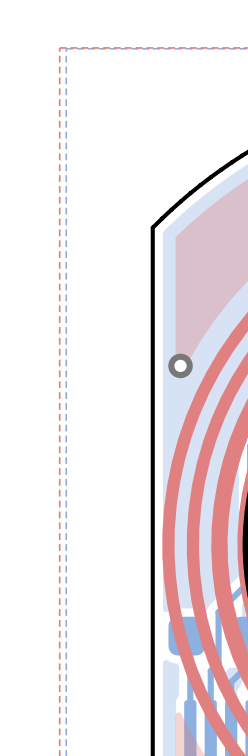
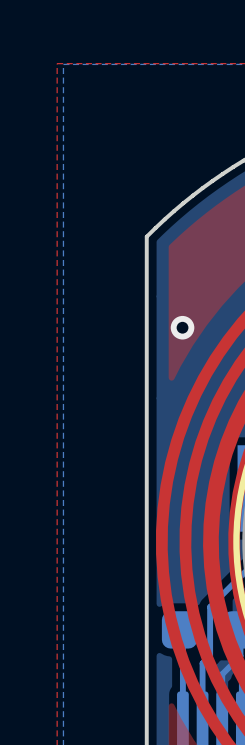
via position: (180, 365) -> (182, 327)

